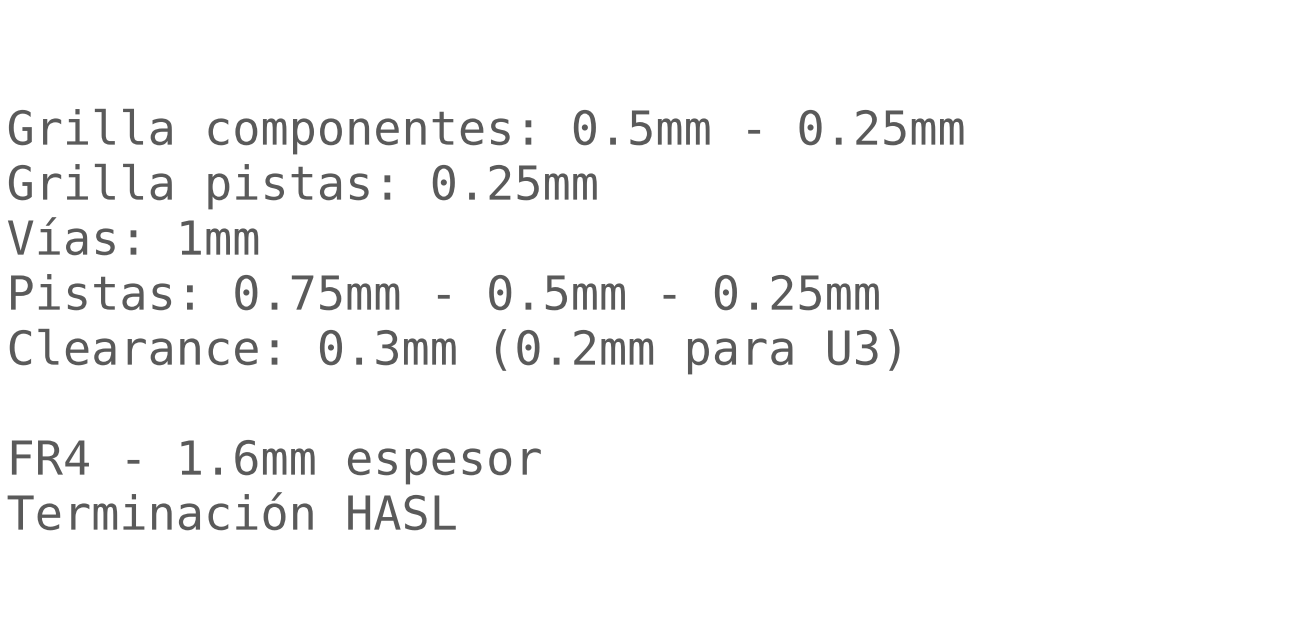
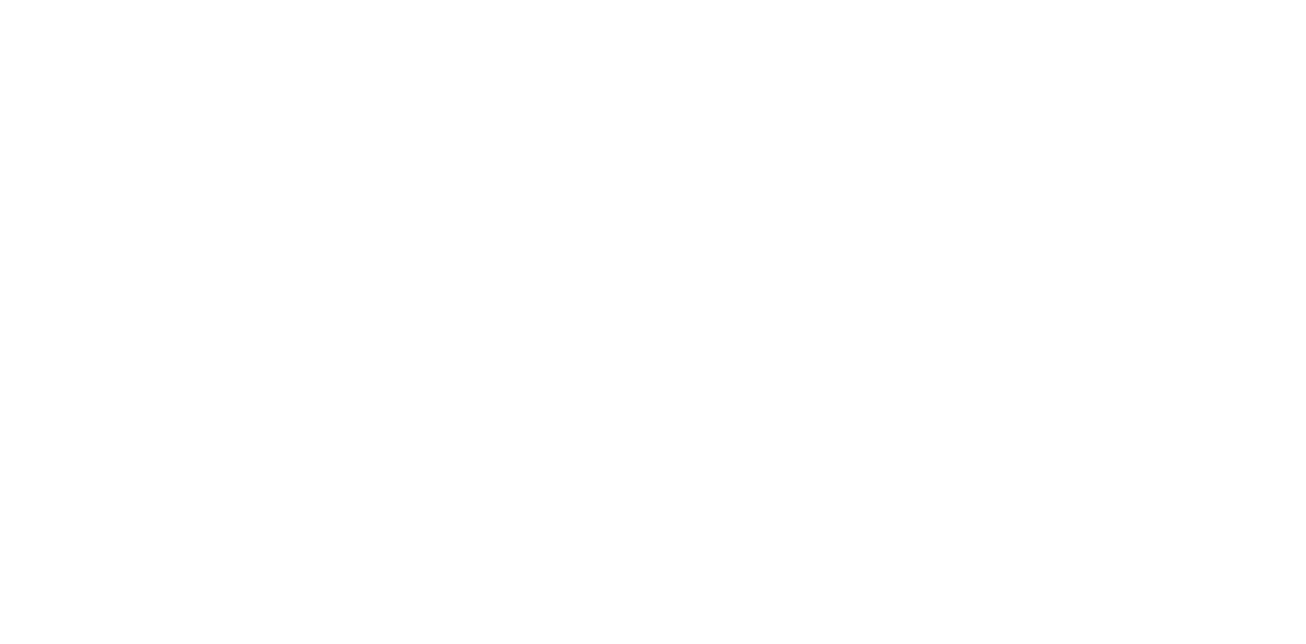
text: Grilla componentes: 0.5mm - 0.25mm (486, 131) -> none
text: Grilla pistas: 0.25mm (302, 186) -> none
text: Vías: 1mm (133, 236) -> none
text: Pistas: 0.75mm - 0.5mm - 0.25mm (444, 292) -> none
text: Clearance: 0.3mm (0.2mm para U3) (454, 351) -> none
text: FR4 - 1.6mm espesor (276, 462) -> none
text: Terminación HASL (231, 511) -> none

